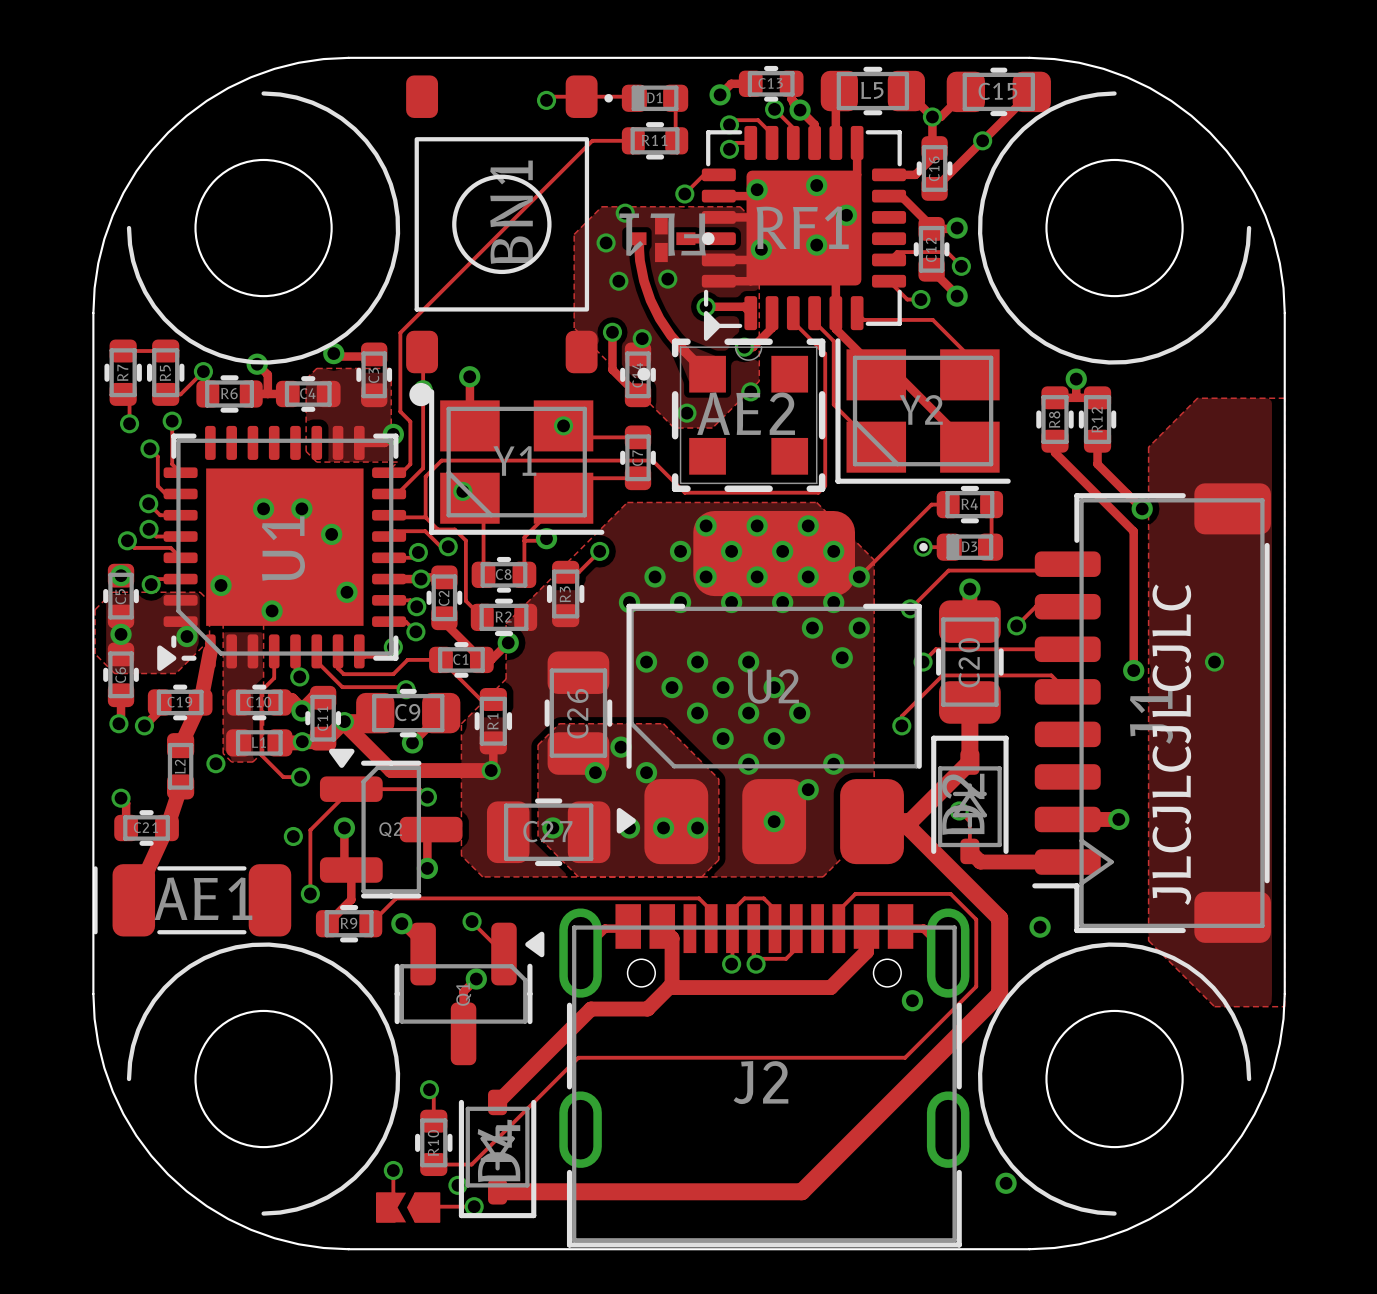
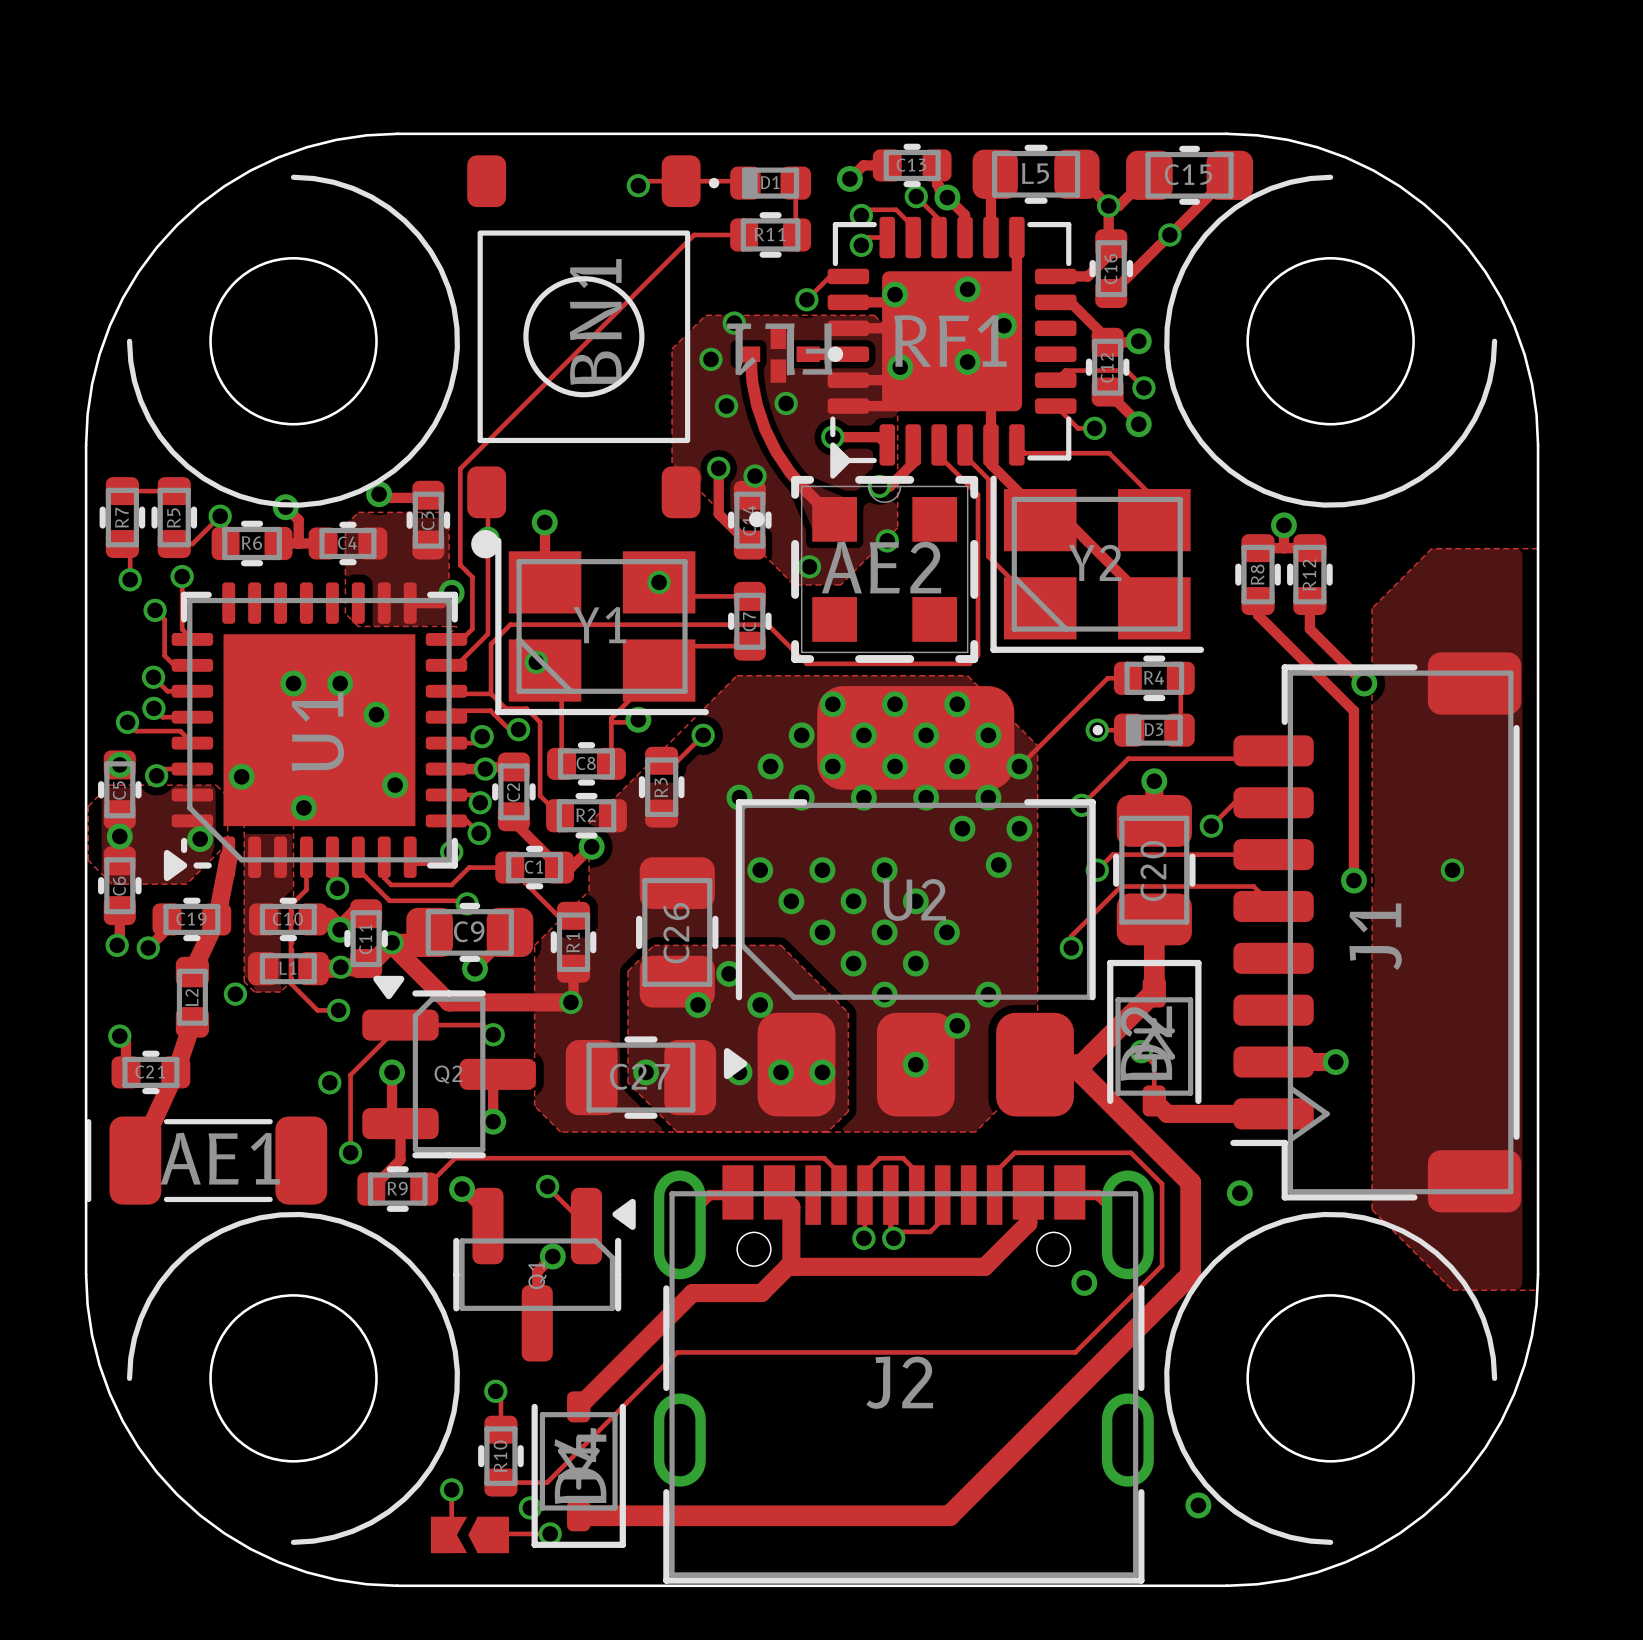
text: JLCJLCJLCJLC (1171, 744) -> none

